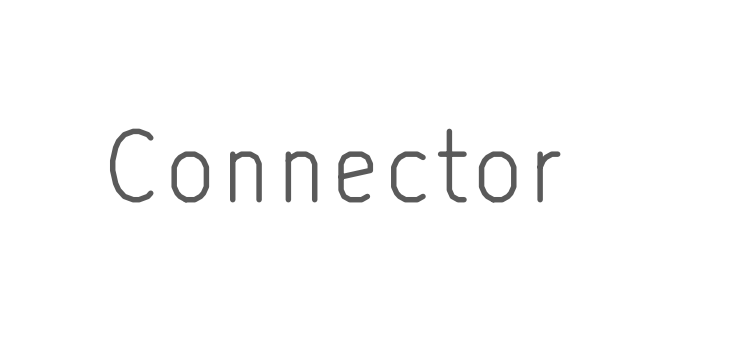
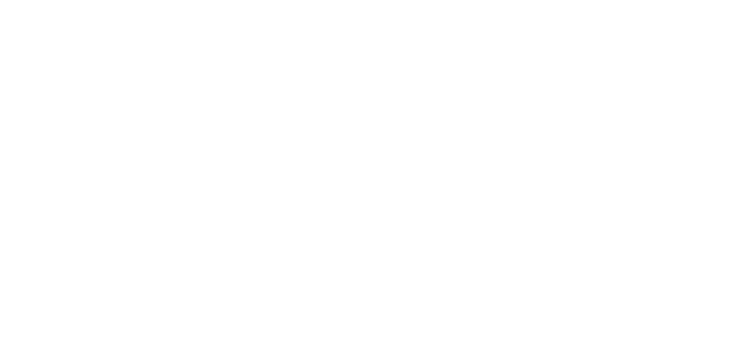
text: Connector (335, 165) -> none

